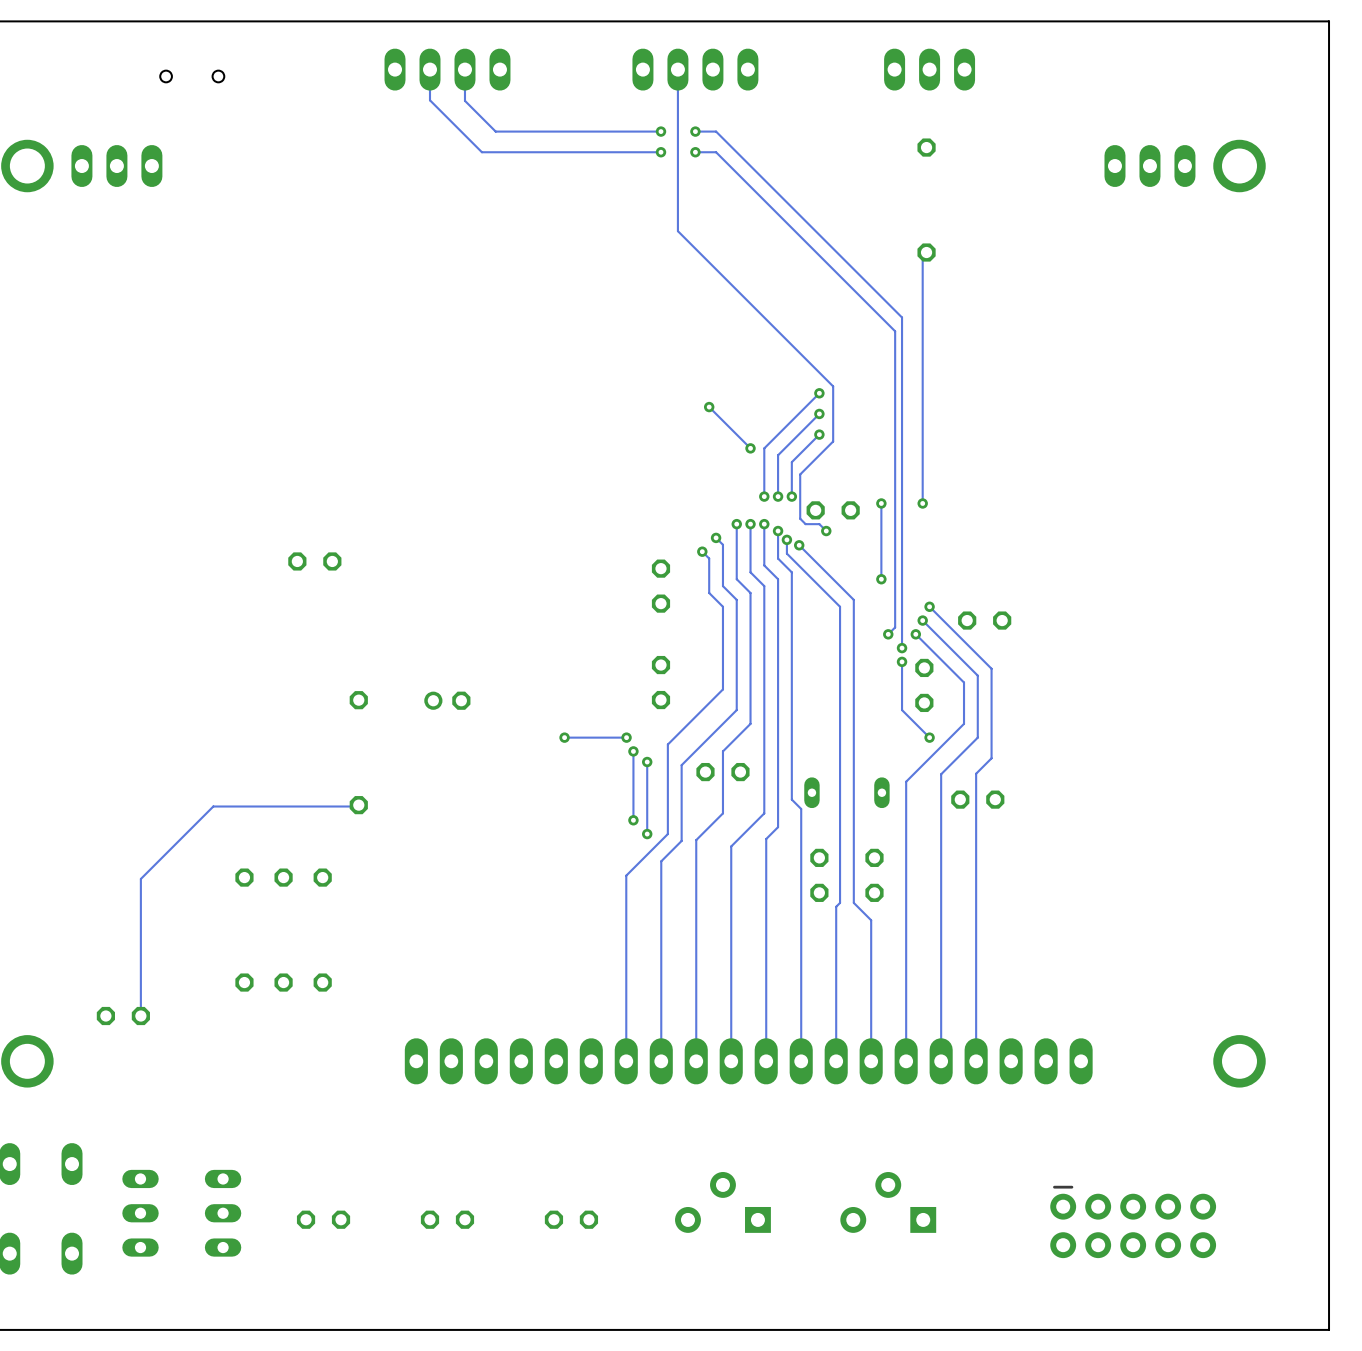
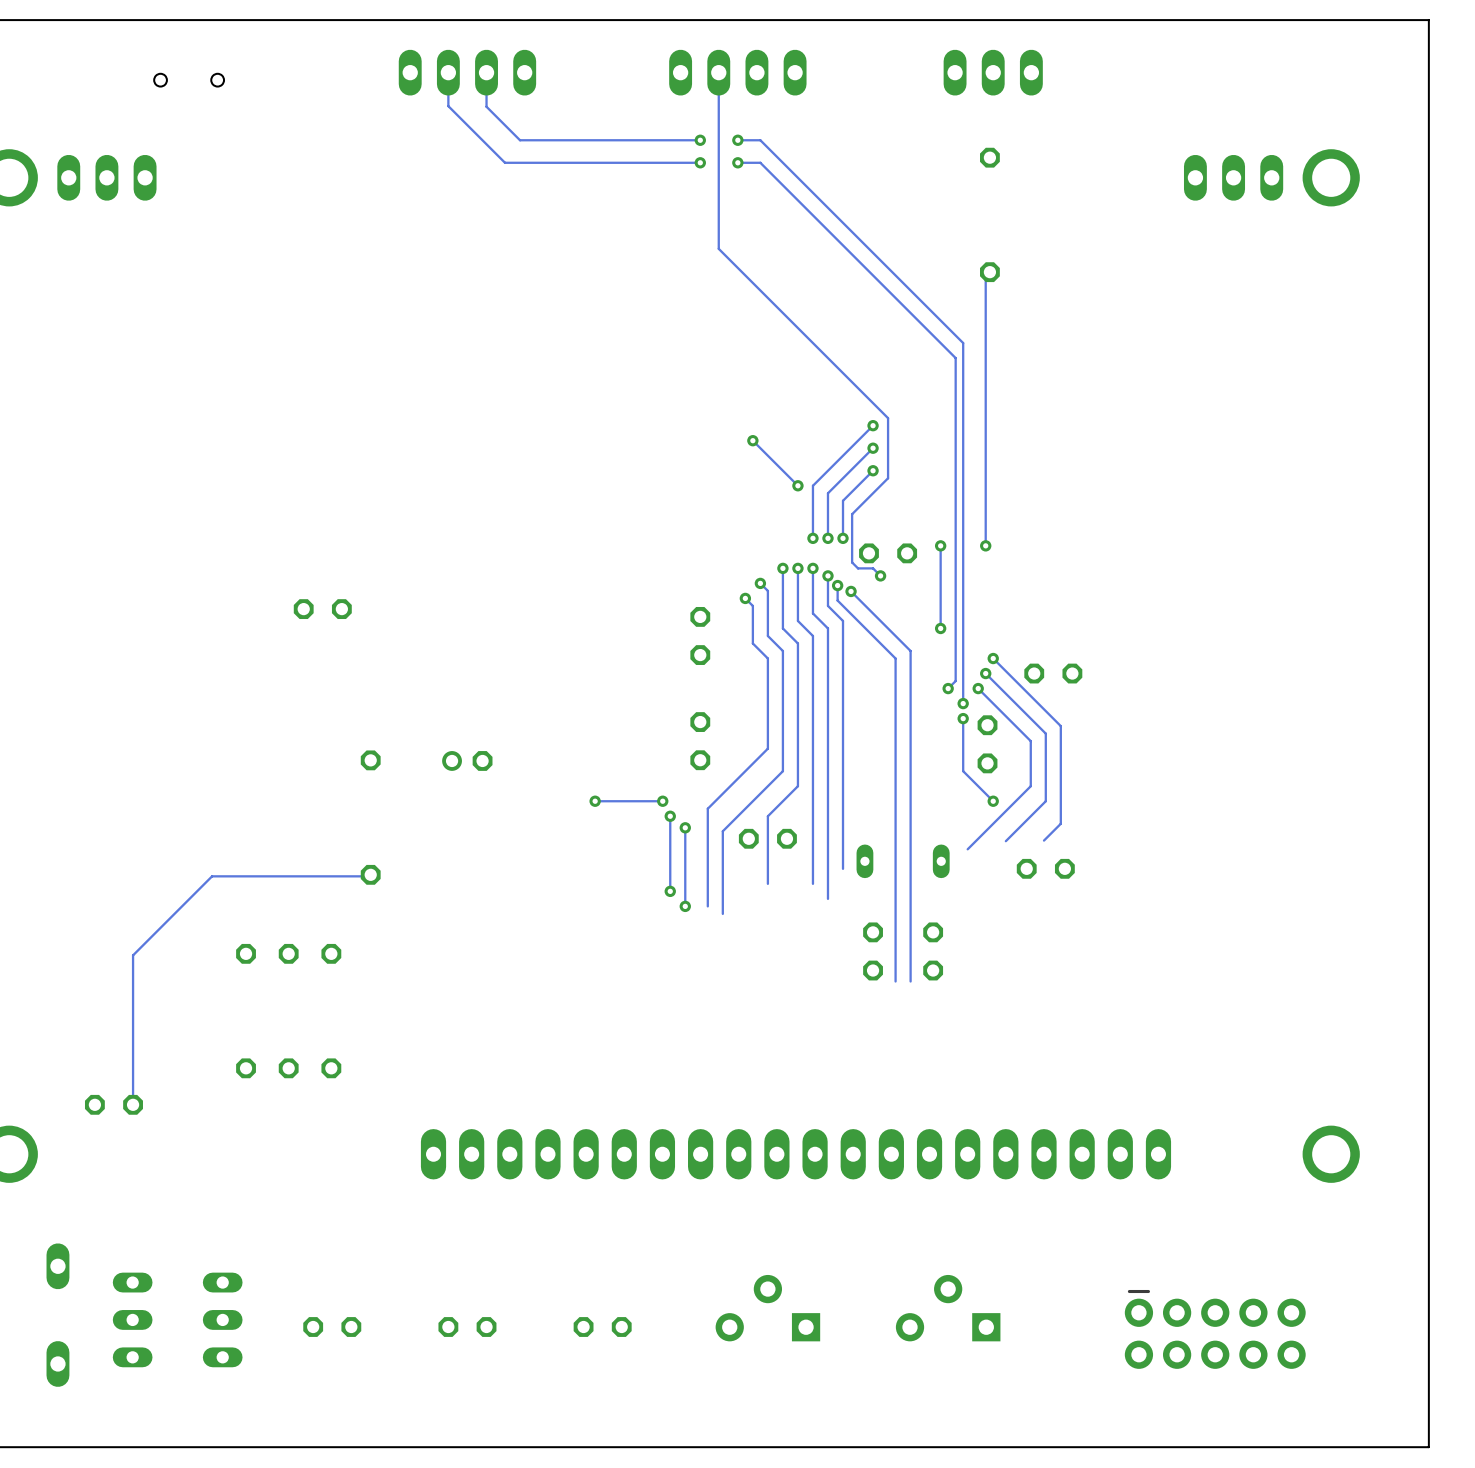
track: (976, 773) (976, 1061) -> none
track: (941, 774) (941, 1061) -> none
track: (906, 781) (906, 1061) -> none
track: (791, 799) (801, 808) (801, 1061) -> none
track: (722, 813) (696, 840) (696, 1061) -> none
track: (764, 813) (731, 846) (731, 1061) -> none
track: (778, 827) (766, 839) (766, 1061) -> none
track: (667, 834) (626, 875) (626, 1061) -> none
track: (681, 840) (661, 861) (661, 1061) -> none
track: (840, 902) (836, 906) (836, 1061) -> none
track: (853, 902) (871, 920) (871, 1061) -> none

